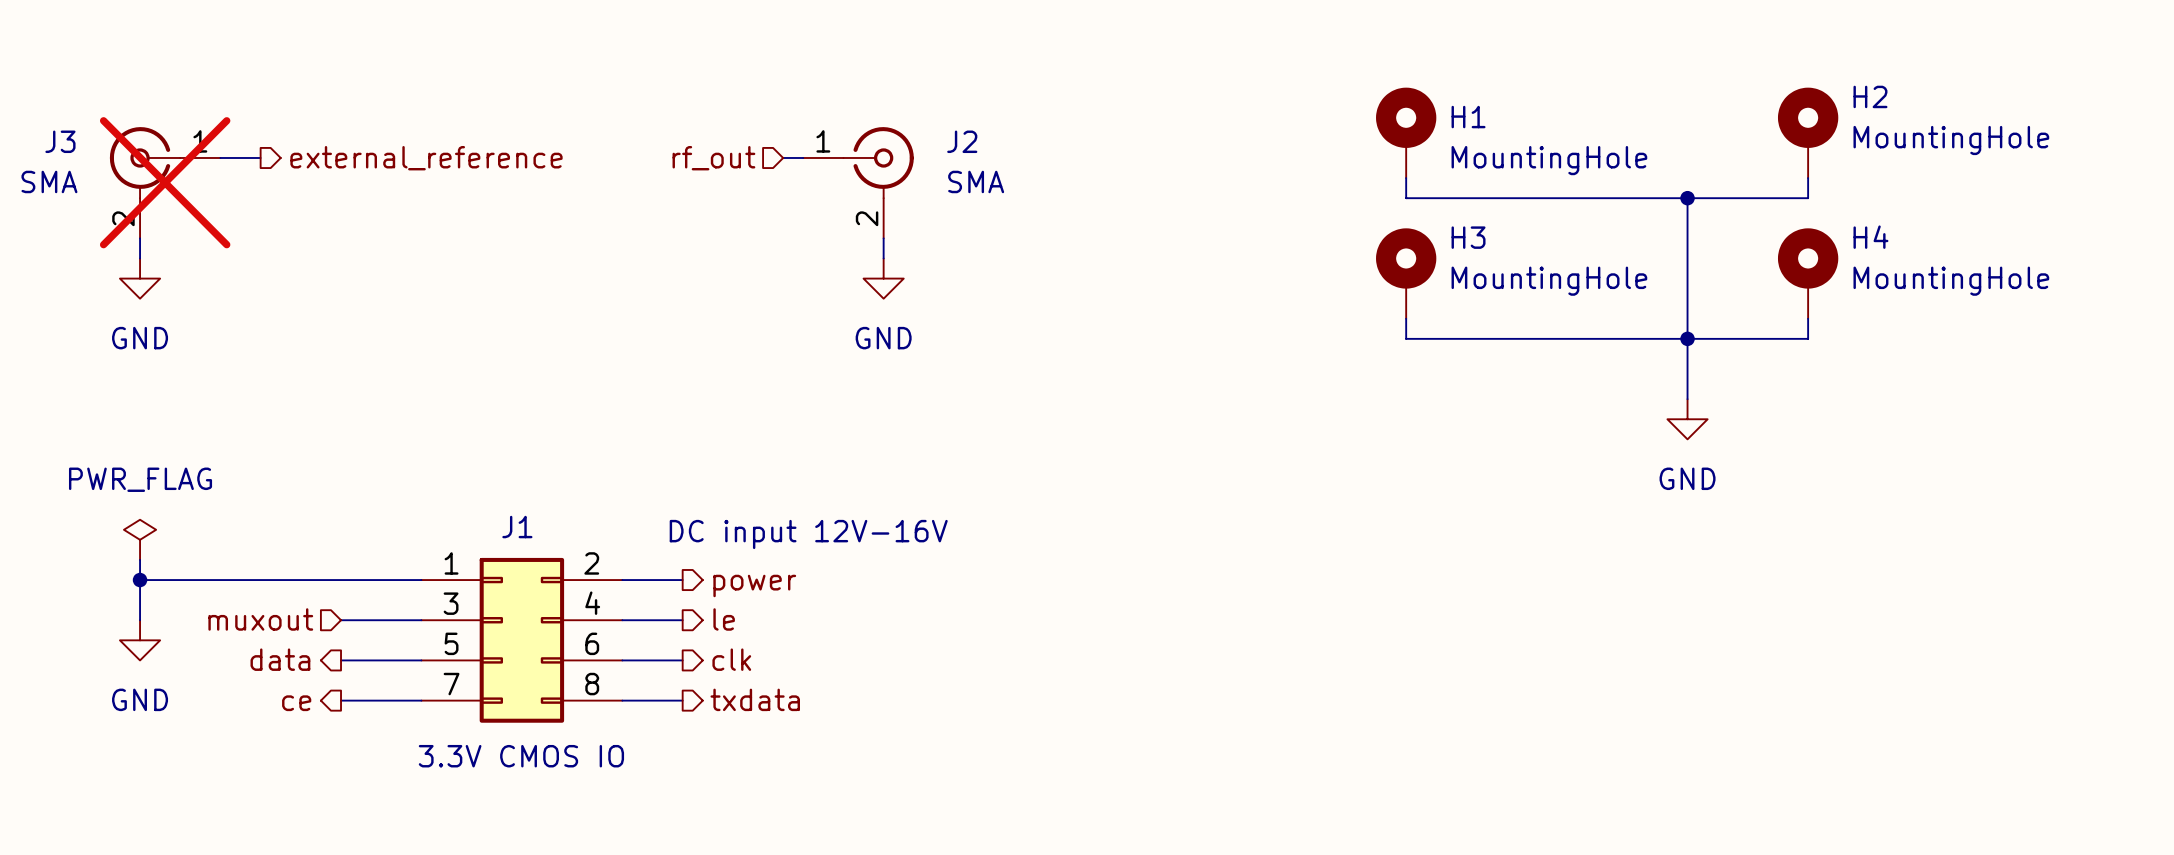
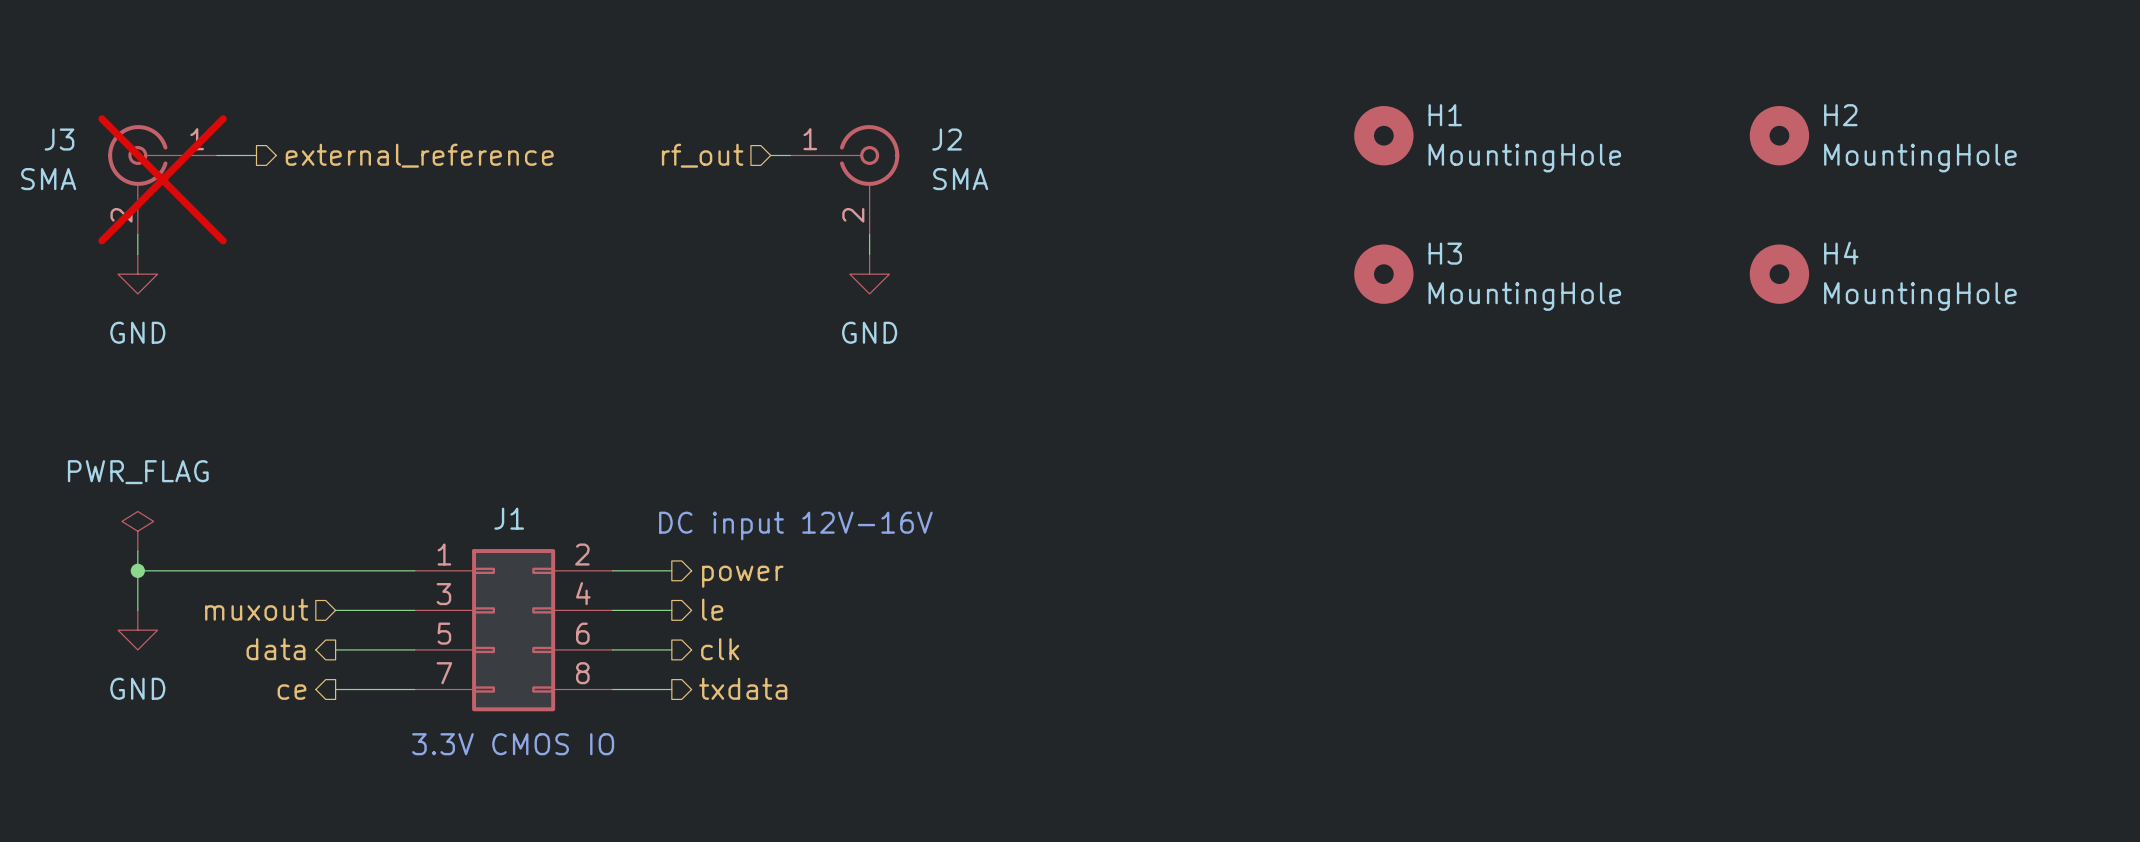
H1 symbol: [1376, 87, 1437, 179] -> [1354, 106, 1414, 166]
H2 symbol: [1777, 87, 1839, 179] -> [1749, 106, 1810, 166]
wire: (1406, 178) (1406, 198) (1808, 198) (1808, 178) -> none
wire: (1687, 198) (1687, 399) -> none
junction: (1687, 198) -> none
H3 symbol: [1376, 228, 1437, 319] -> [1354, 244, 1414, 304]
H4 symbol: [1777, 228, 1839, 319] -> [1749, 244, 1810, 304]
wire: (1406, 318) (1406, 338) (1808, 338) (1808, 318) -> none
junction: (1687, 338) -> none
power symbol: GND (1687, 419) -> none

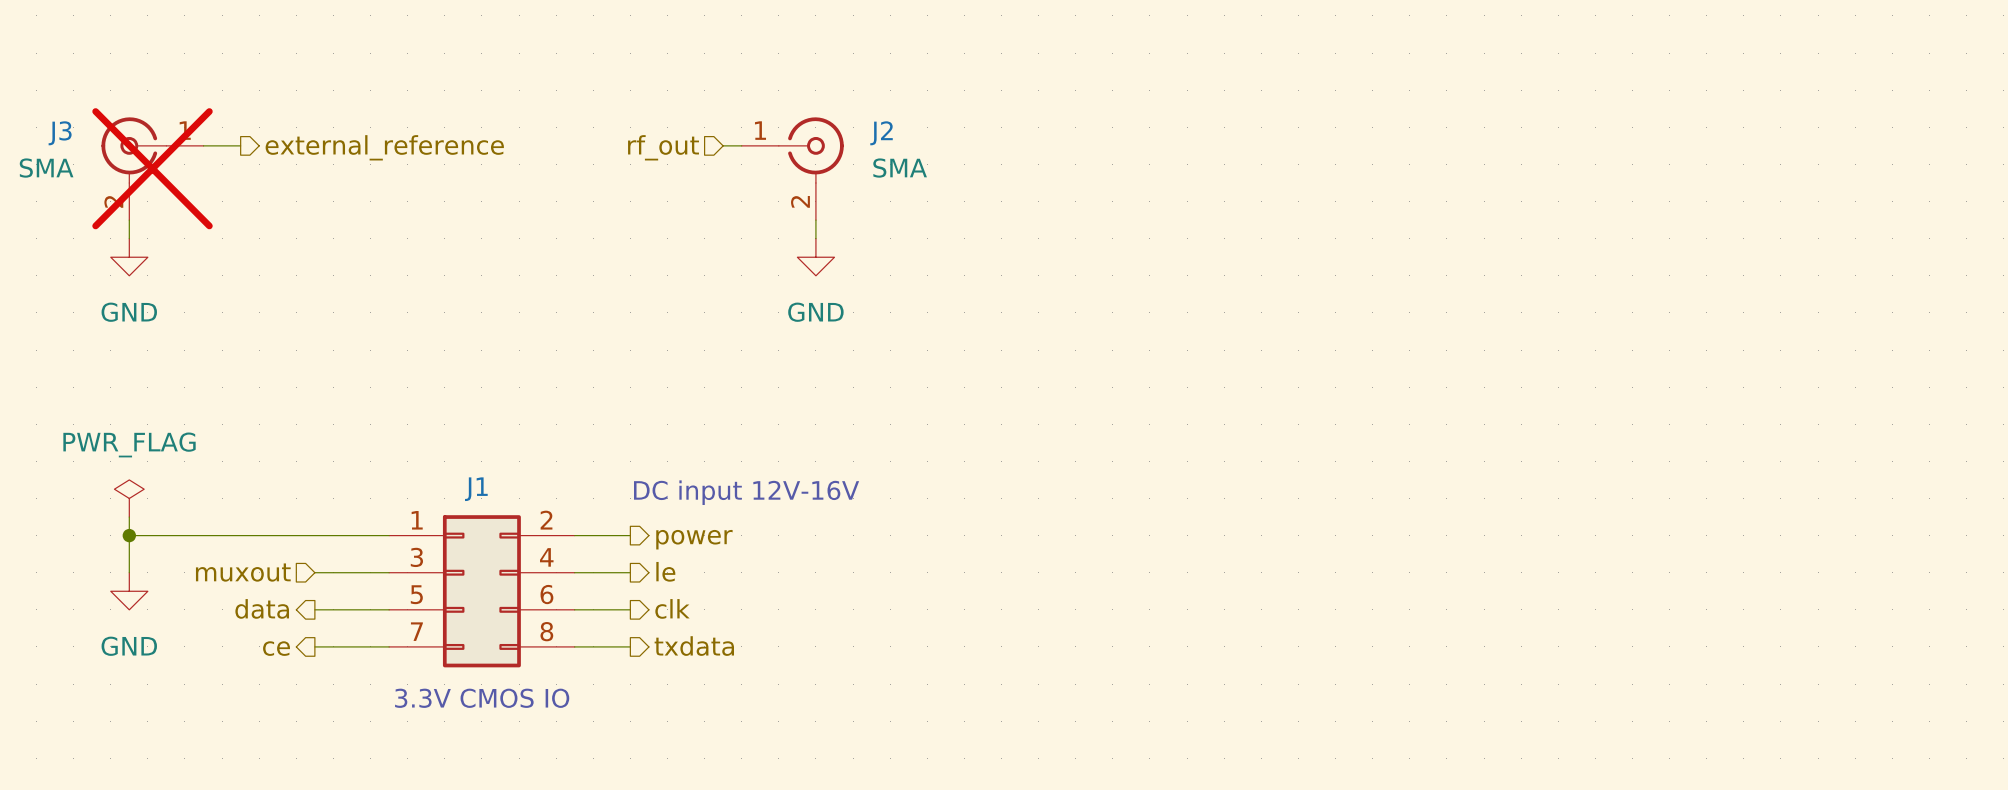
H1: MountingHole (1383, 135) -> none
H2: MountingHole (1779, 135) -> none
H3: MountingHole (1383, 274) -> none
H4: MountingHole (1779, 274) -> none

